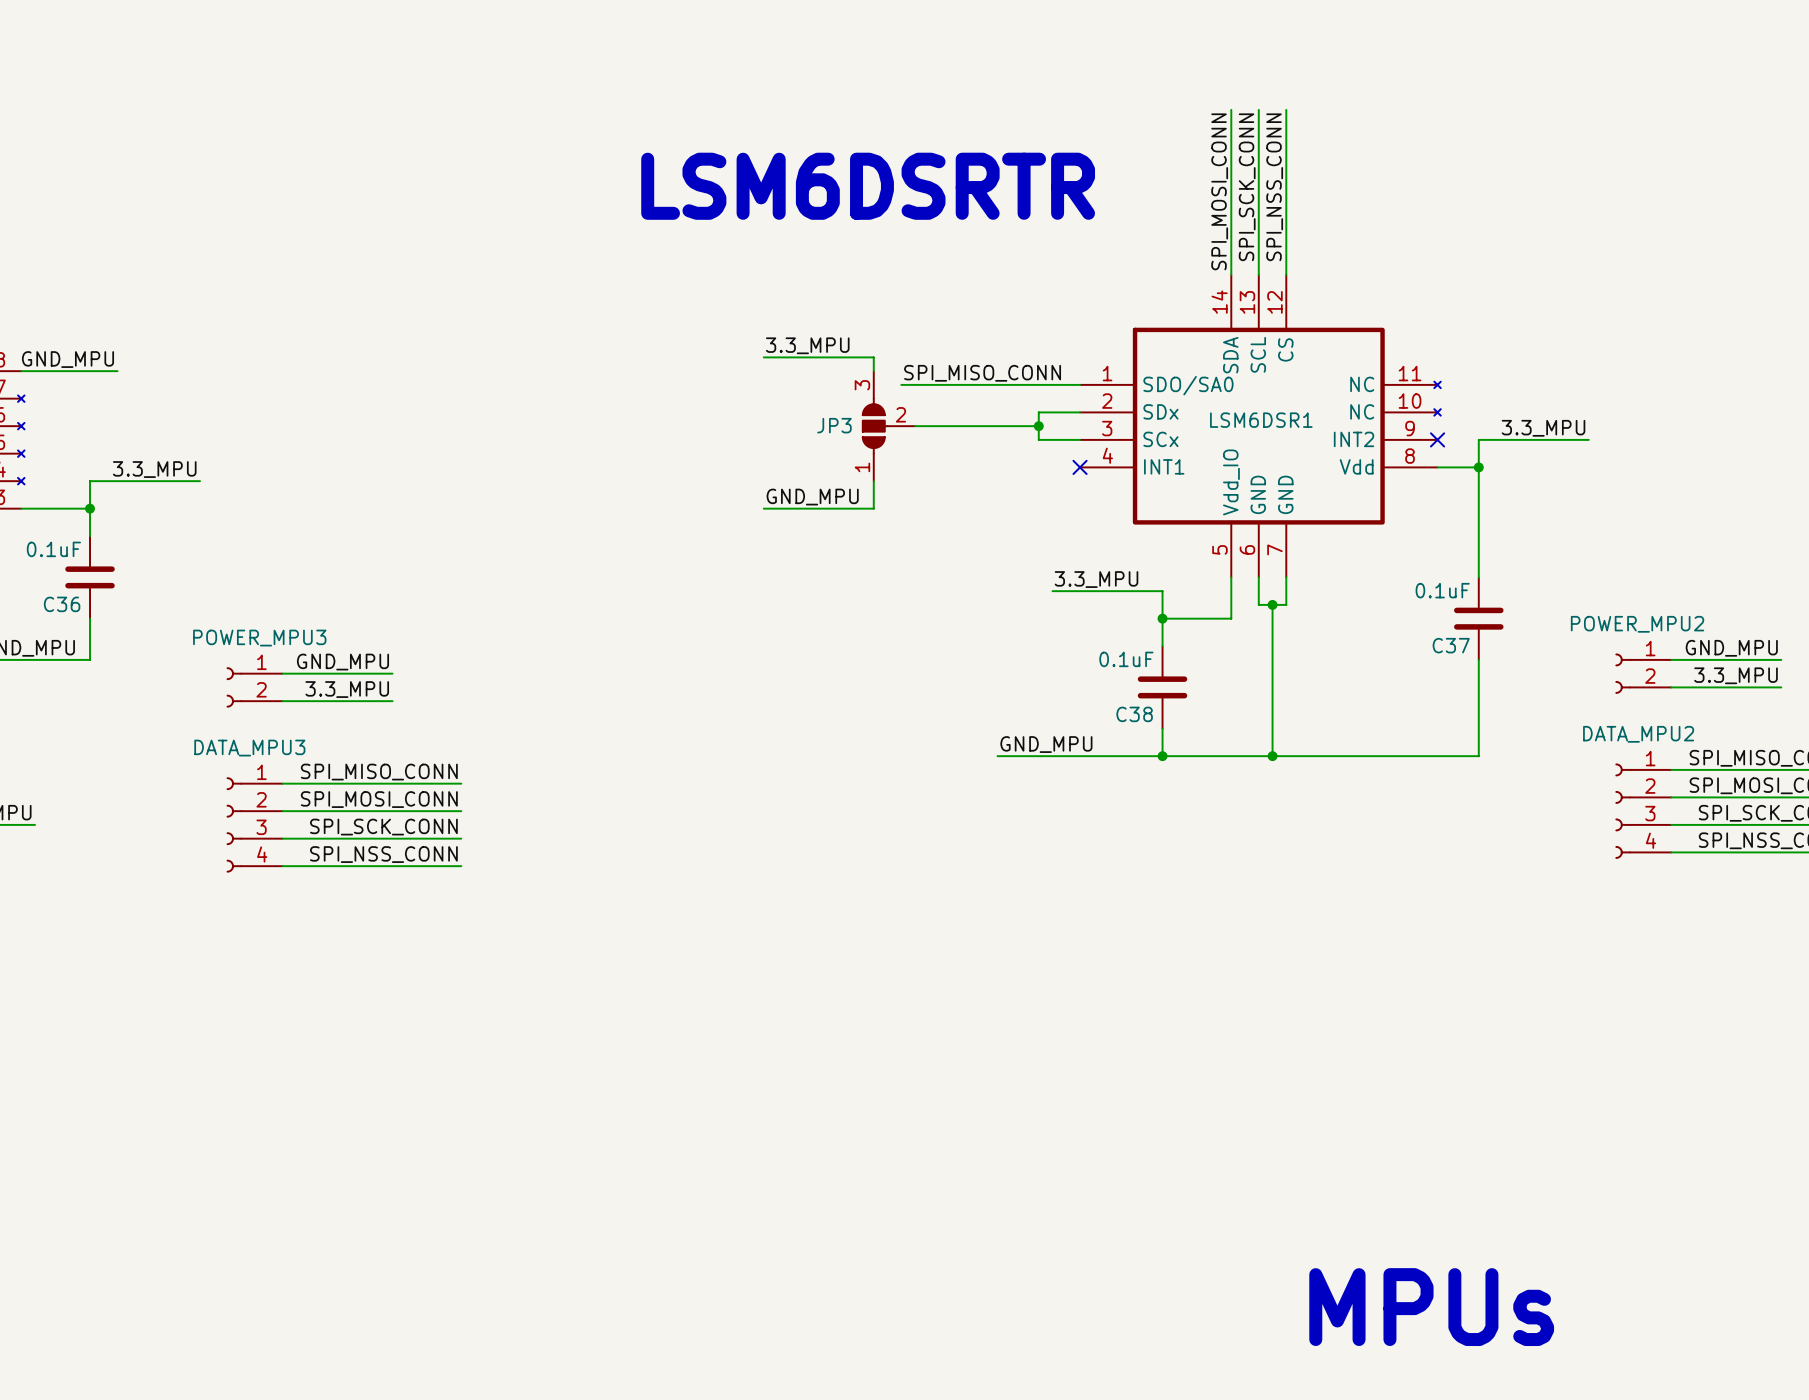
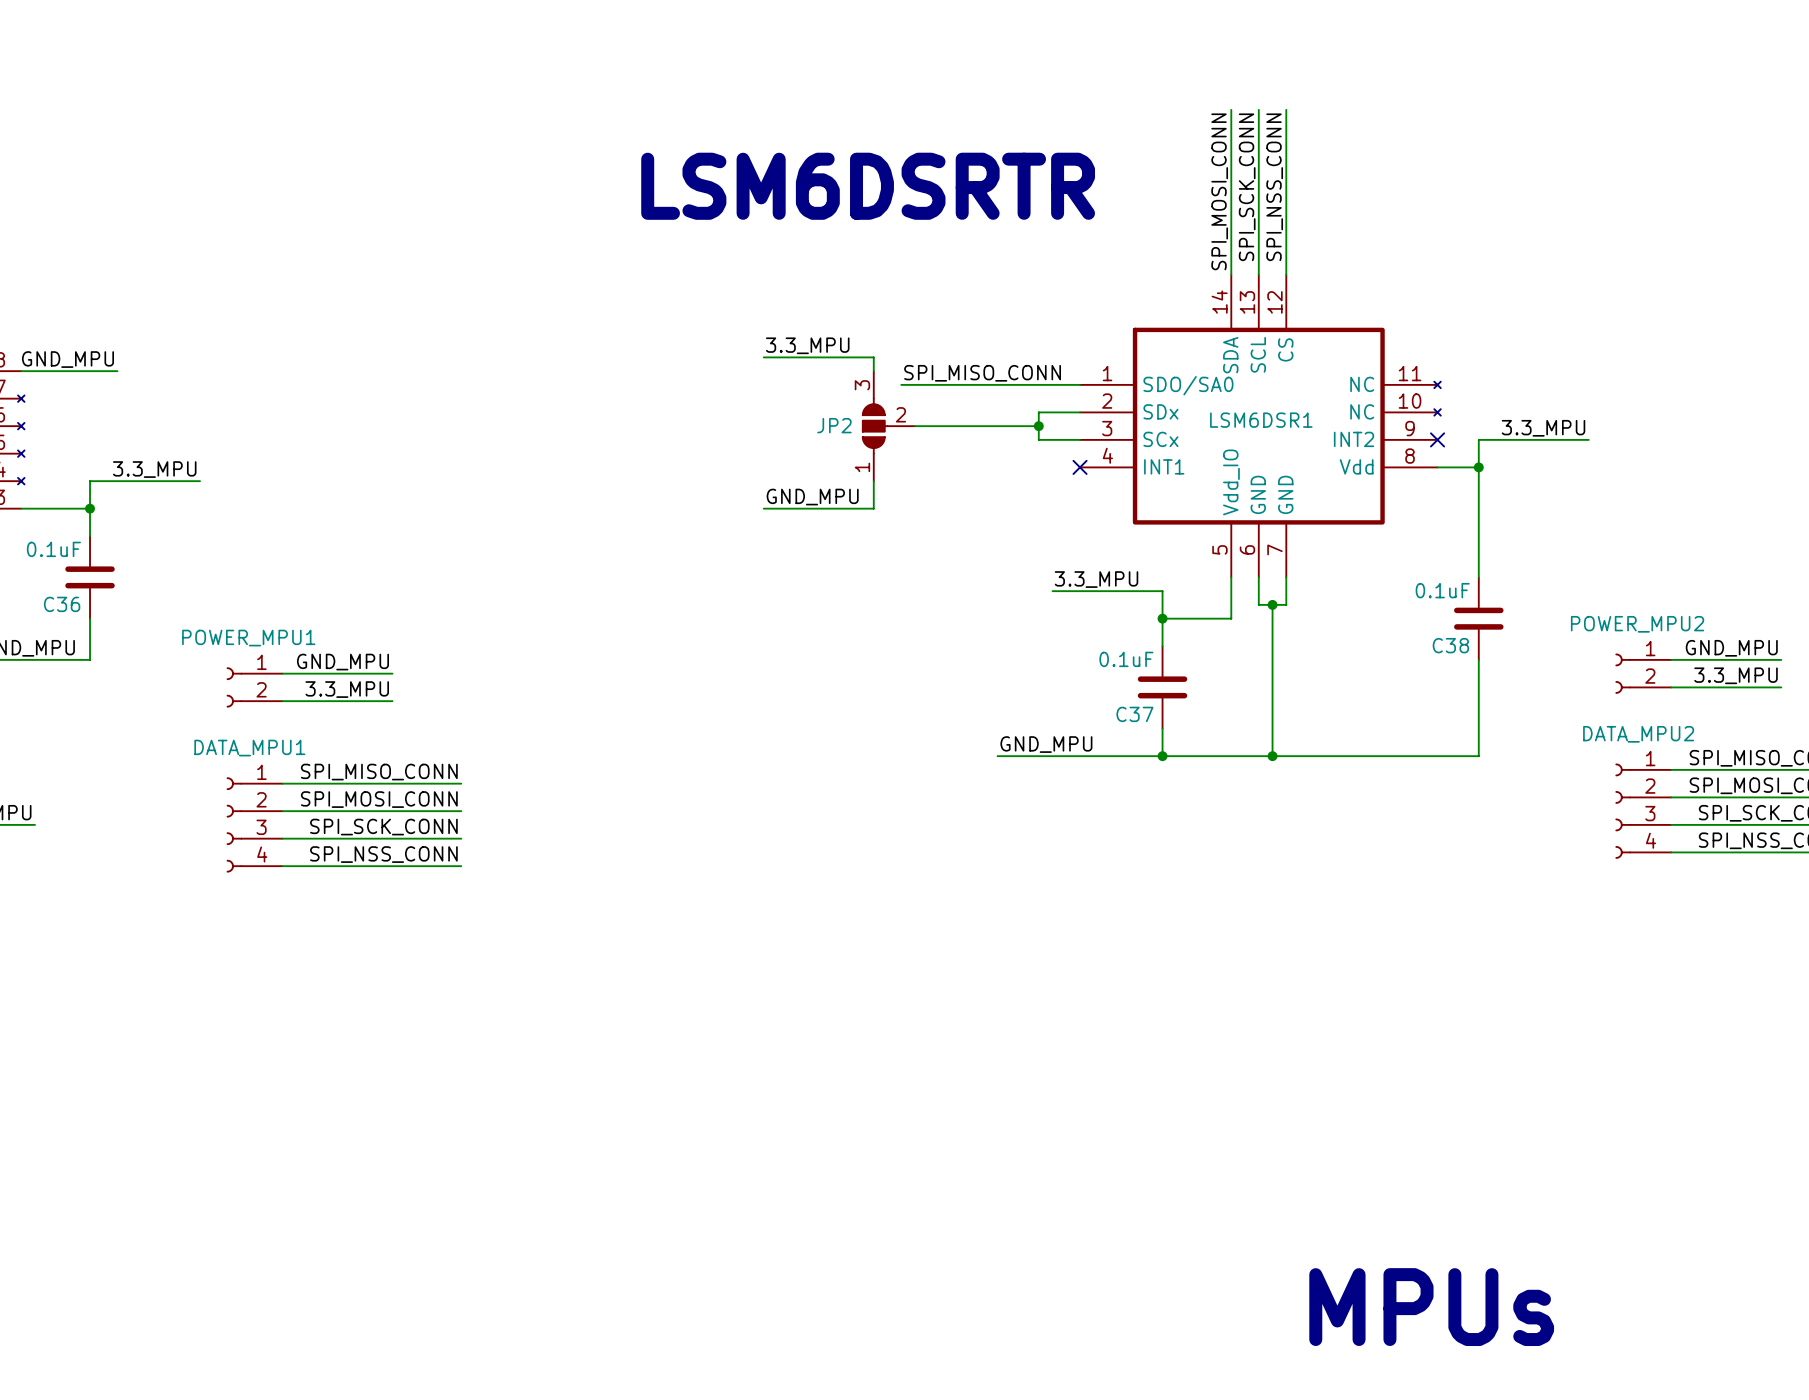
JP3 name: JP3 (834, 425) -> JP2 (834, 425)
POWER_MPU3 name: POWER_MPU3 (259, 638) -> POWER_MPU1 (248, 638)
C37 name: C37 (1451, 645) -> C38 (1450, 645)
C38 name: C38 (1134, 714) -> C37 (1134, 714)
DATA_MPU3 name: DATA_MPU3 (249, 748) -> DATA_MPU1 (249, 748)

